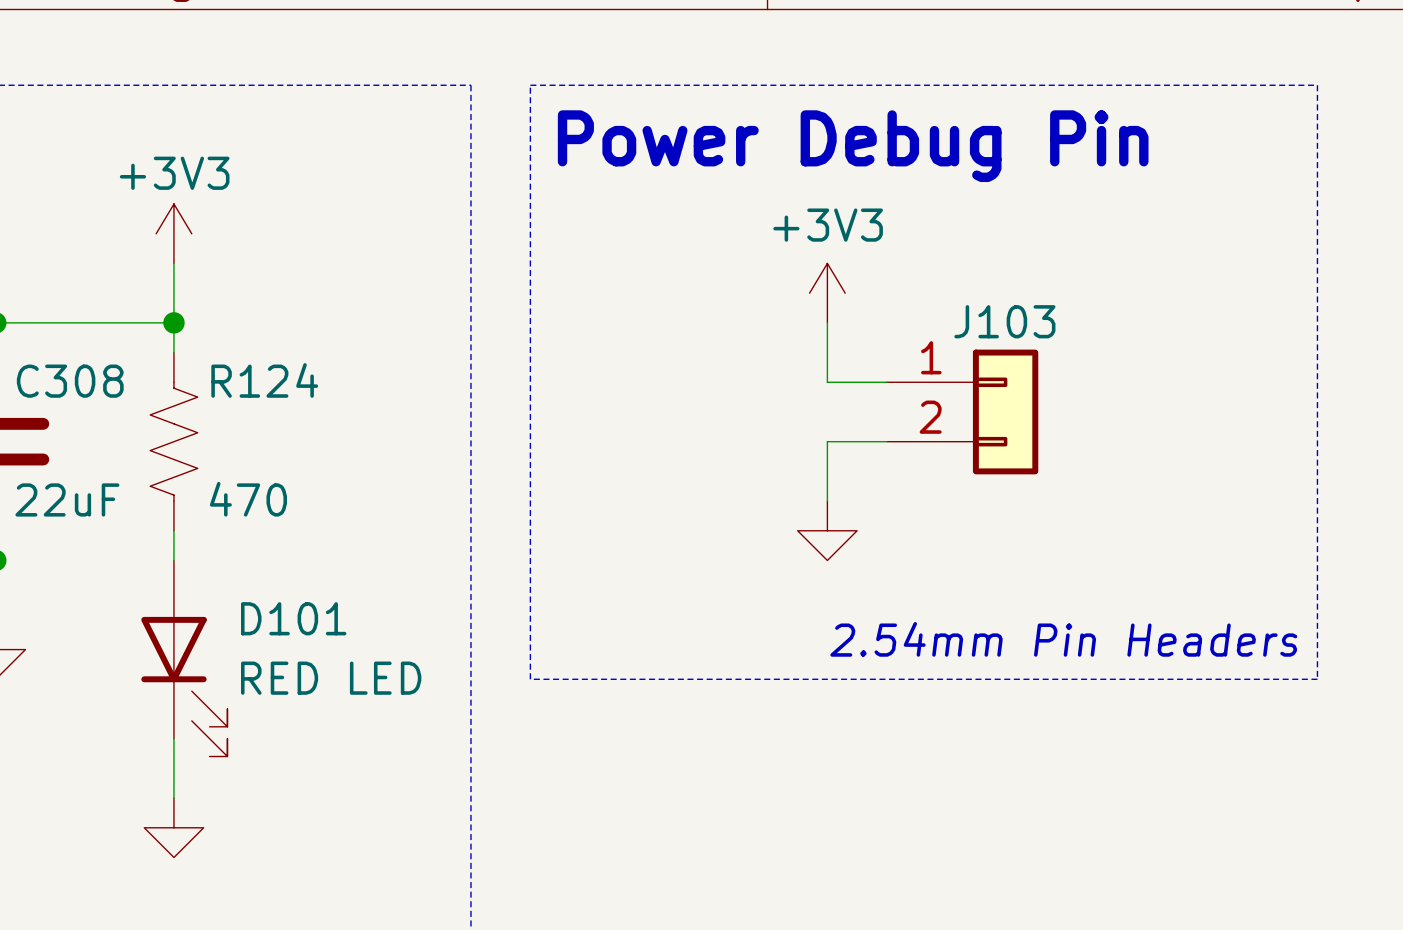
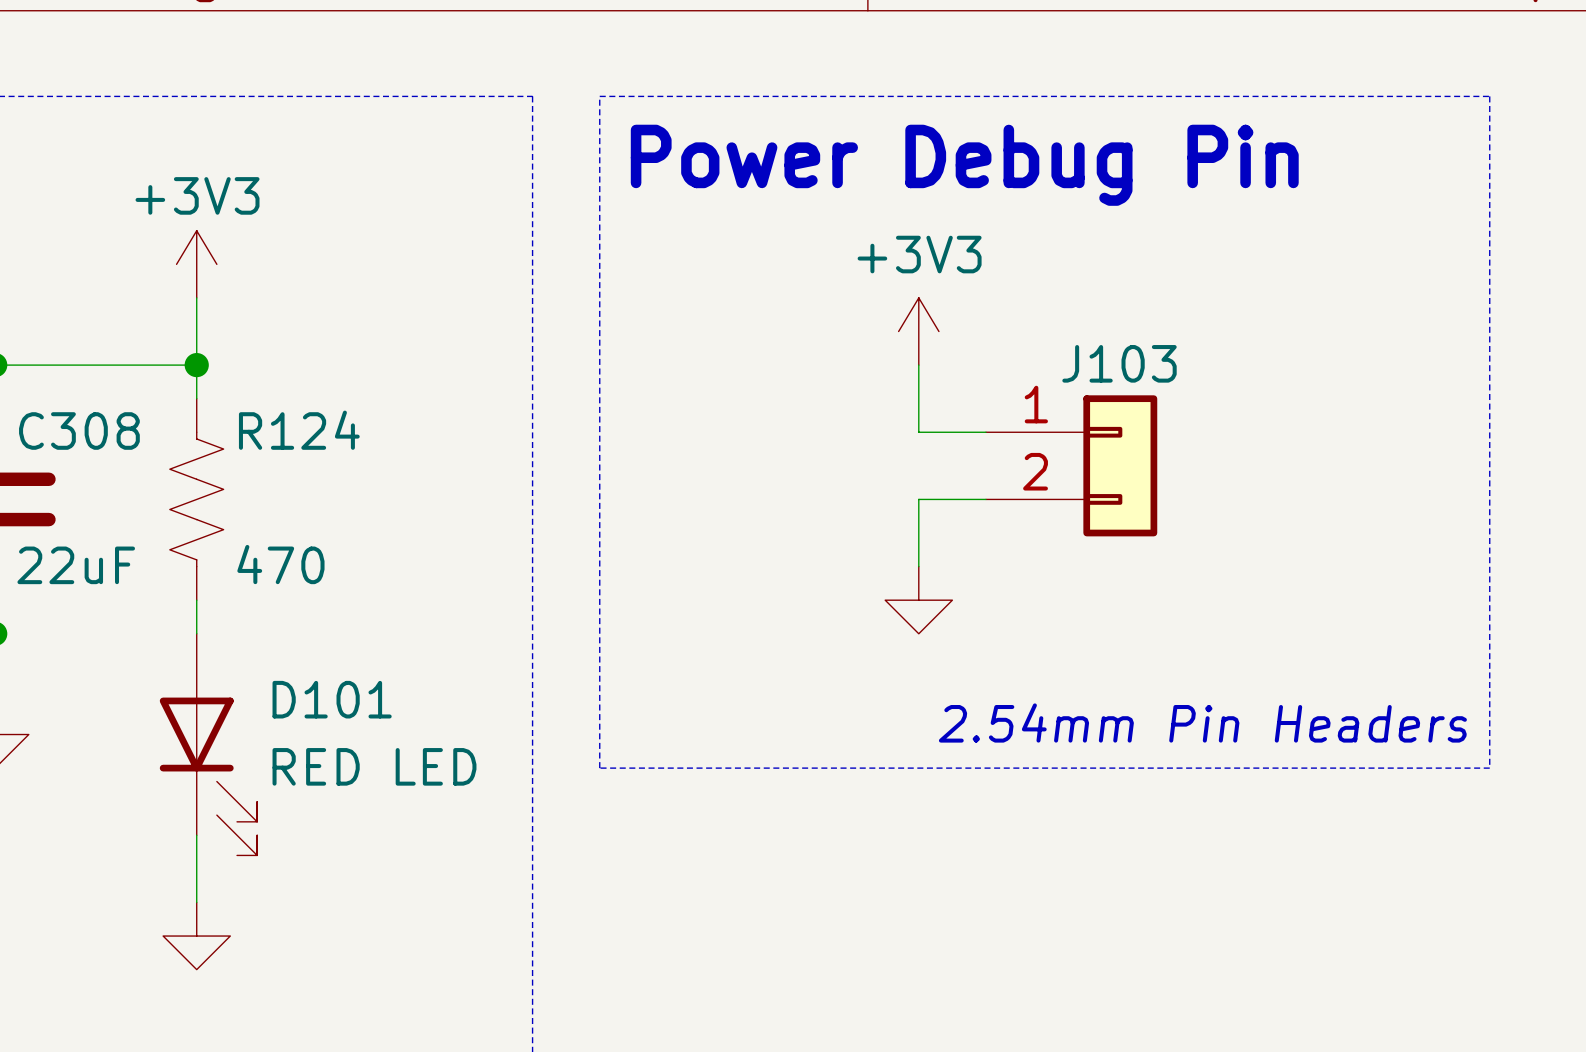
power symbol position: +3V3 (827, 293) -> +3V3 (918, 331)
wire: (827, 322) (827, 382) -> (918, 365) (918, 432) (935, 432)
J103 position: (962, 411) -> (1071, 465)
wire: (827, 441) (827, 501) -> (935, 499) (918, 499) (918, 566)
power symbol position: (827, 530) -> (918, 600)

